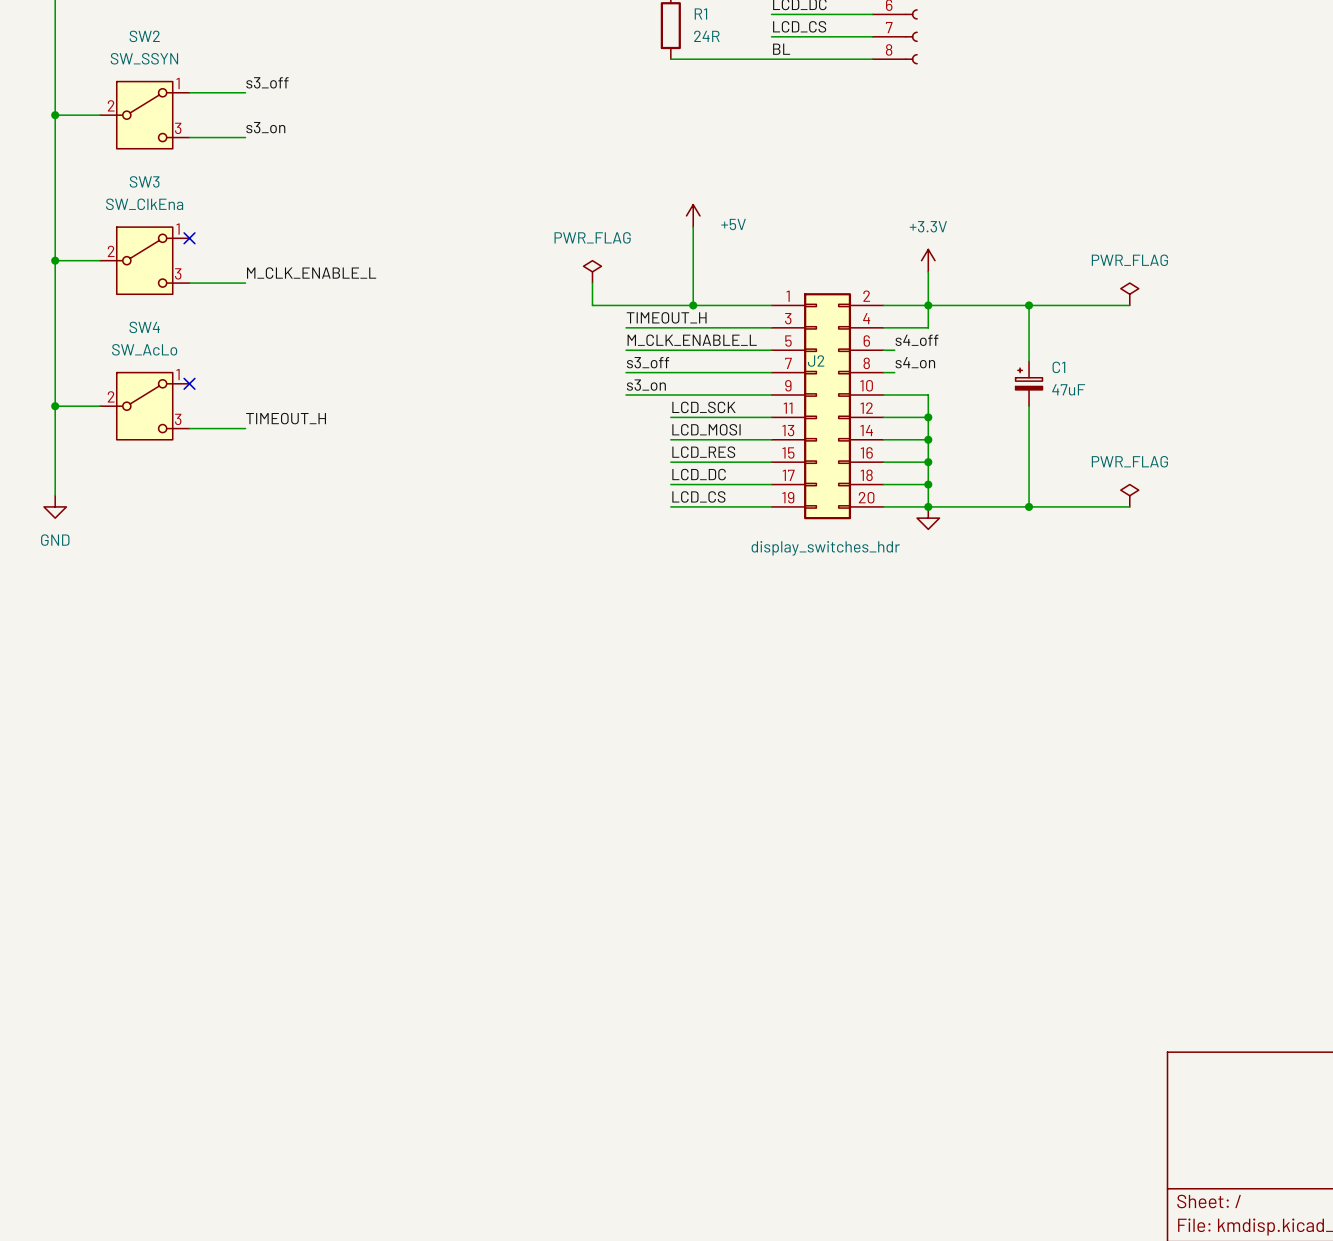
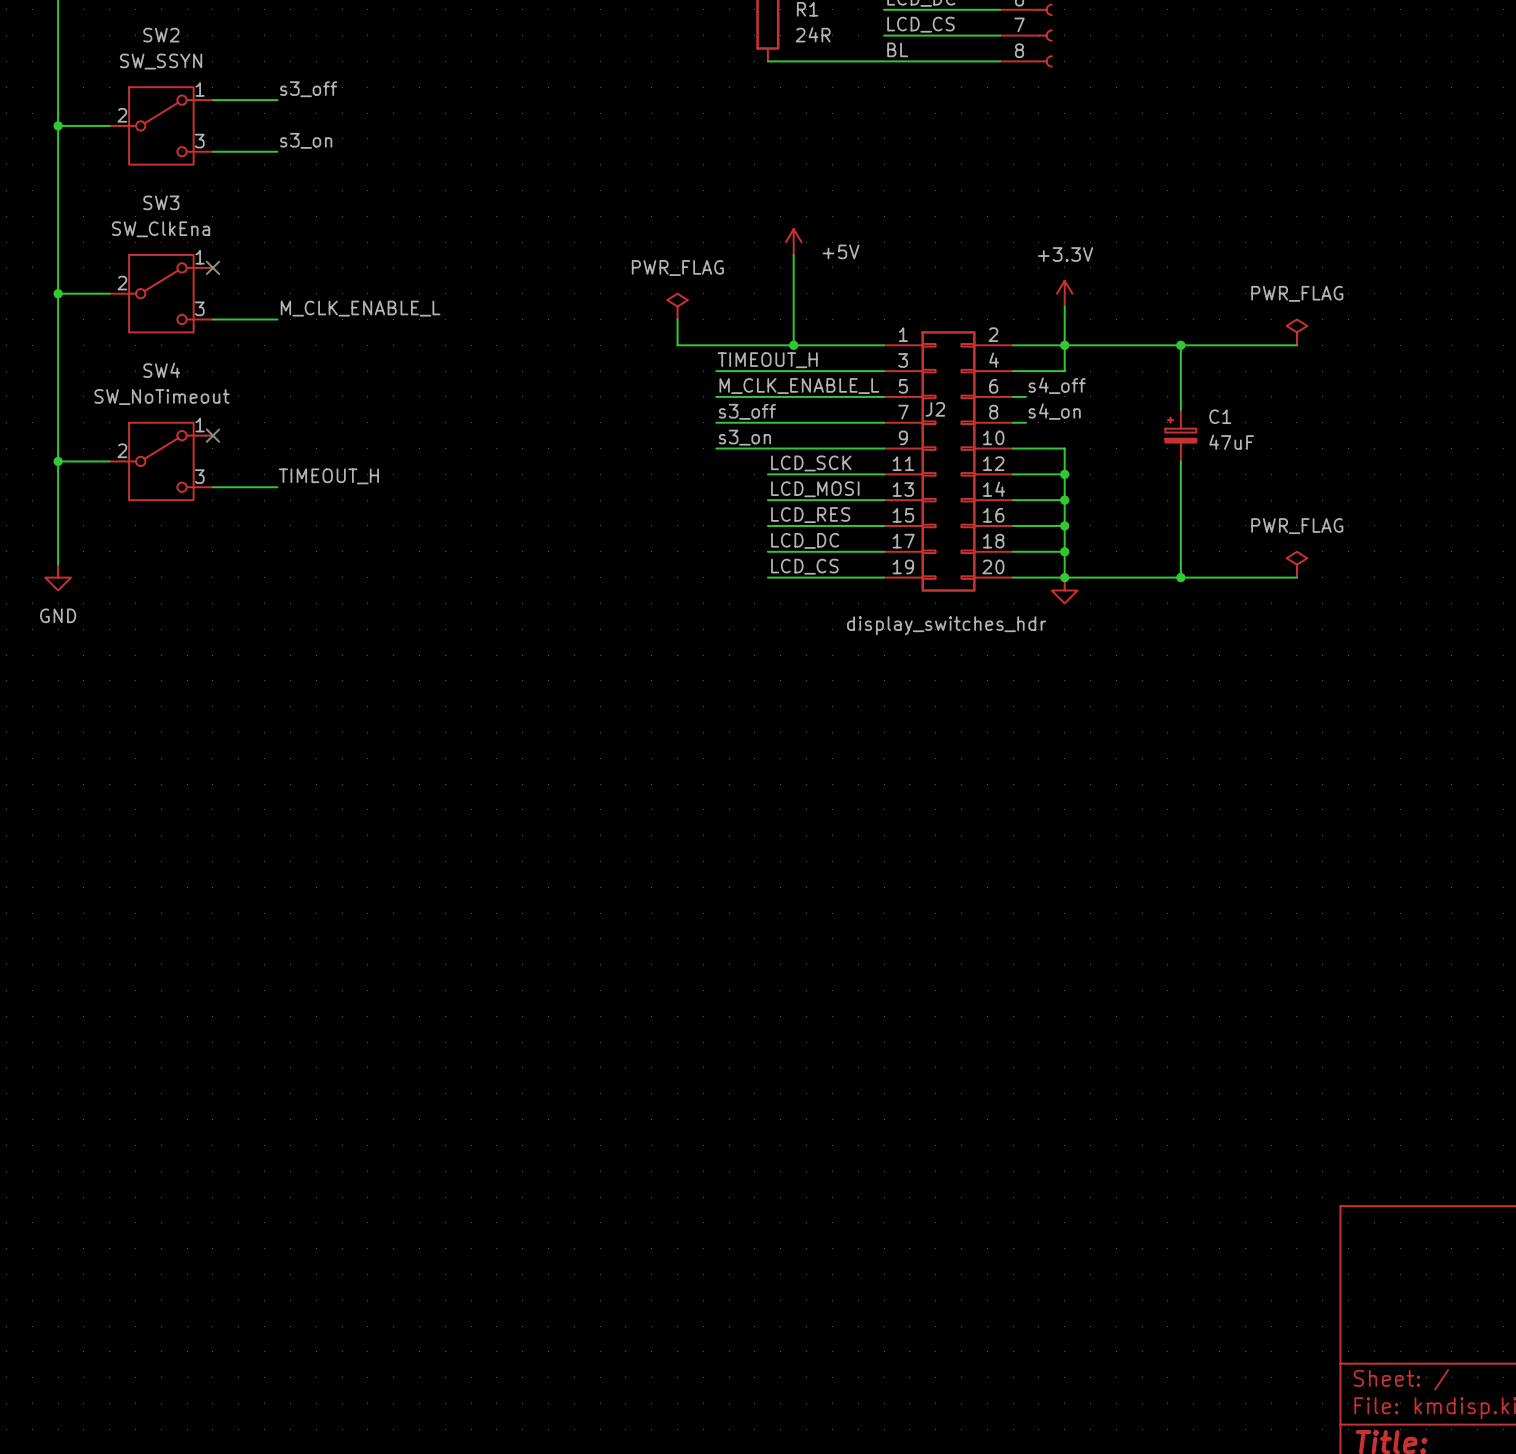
SW4 value: SW_AcLo (144, 349) -> SW_NoTimeout (161, 397)

